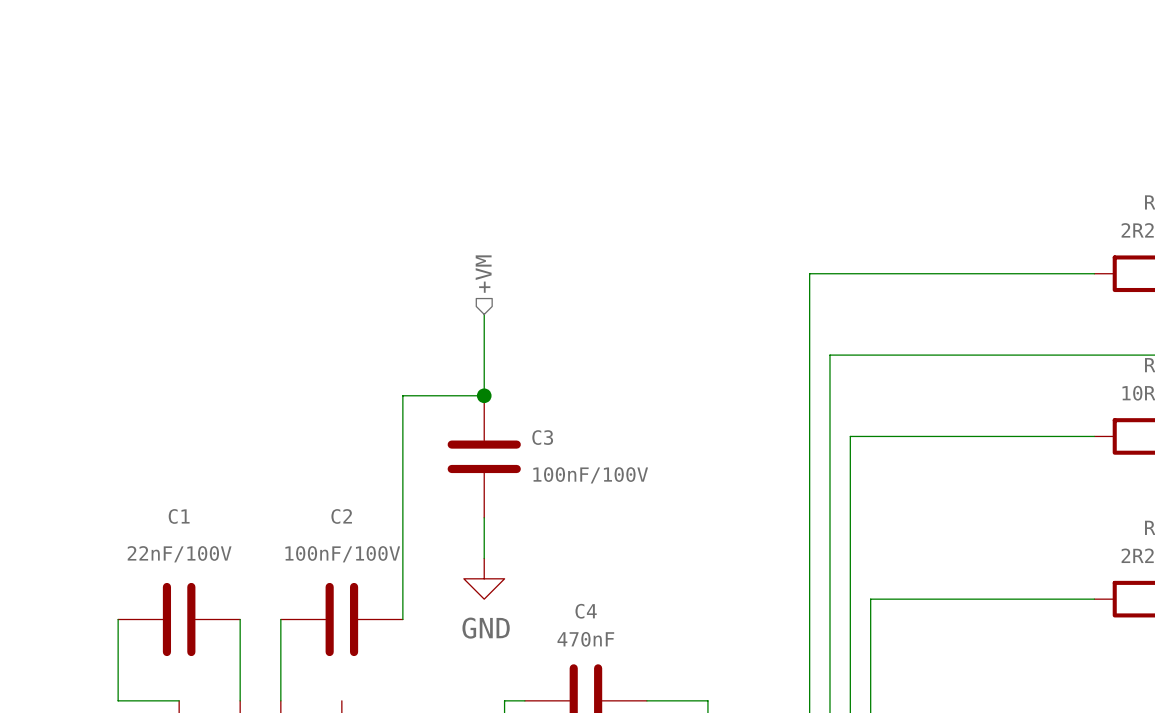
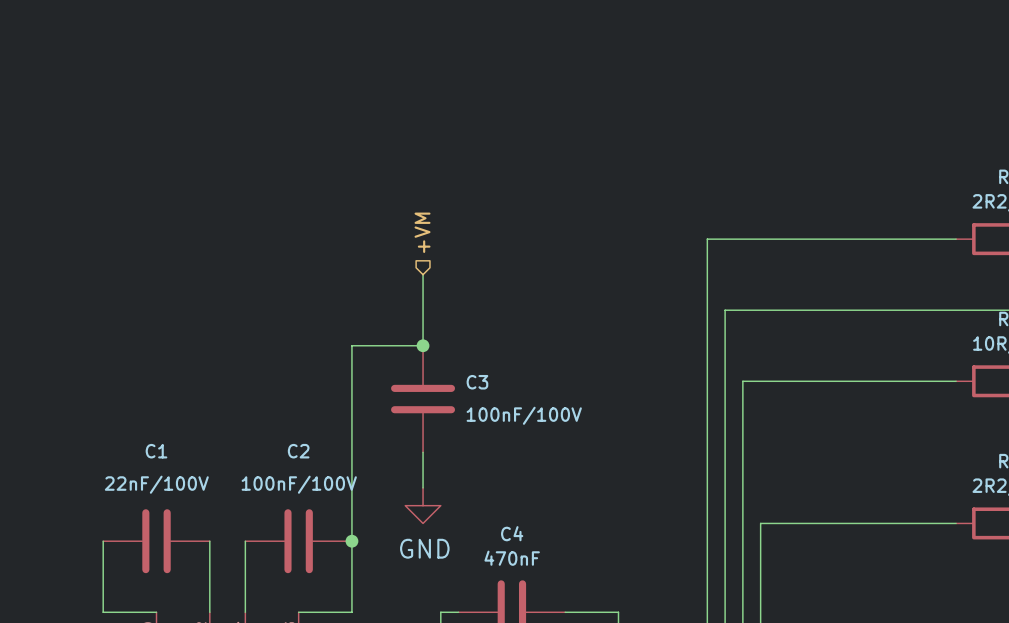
wire: none -> (351, 541) (351, 612) (298, 612)
junction: none -> (351, 541)

